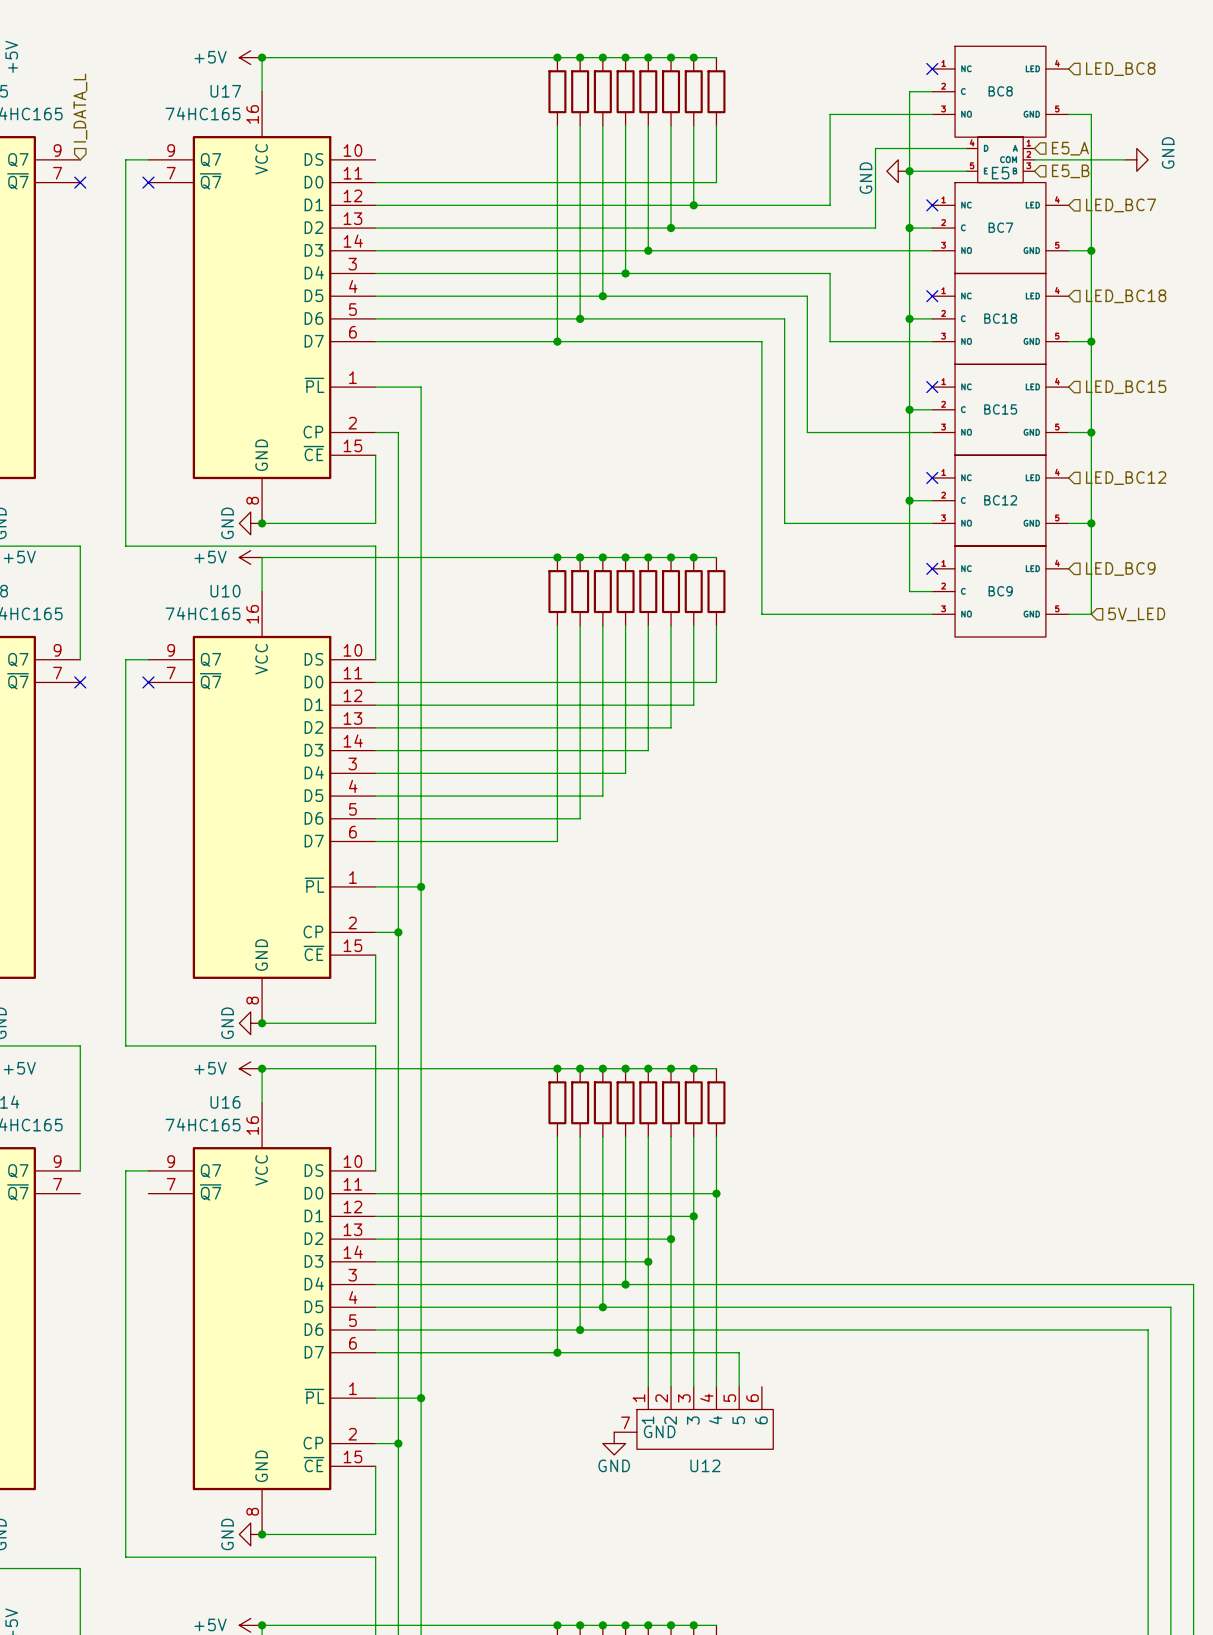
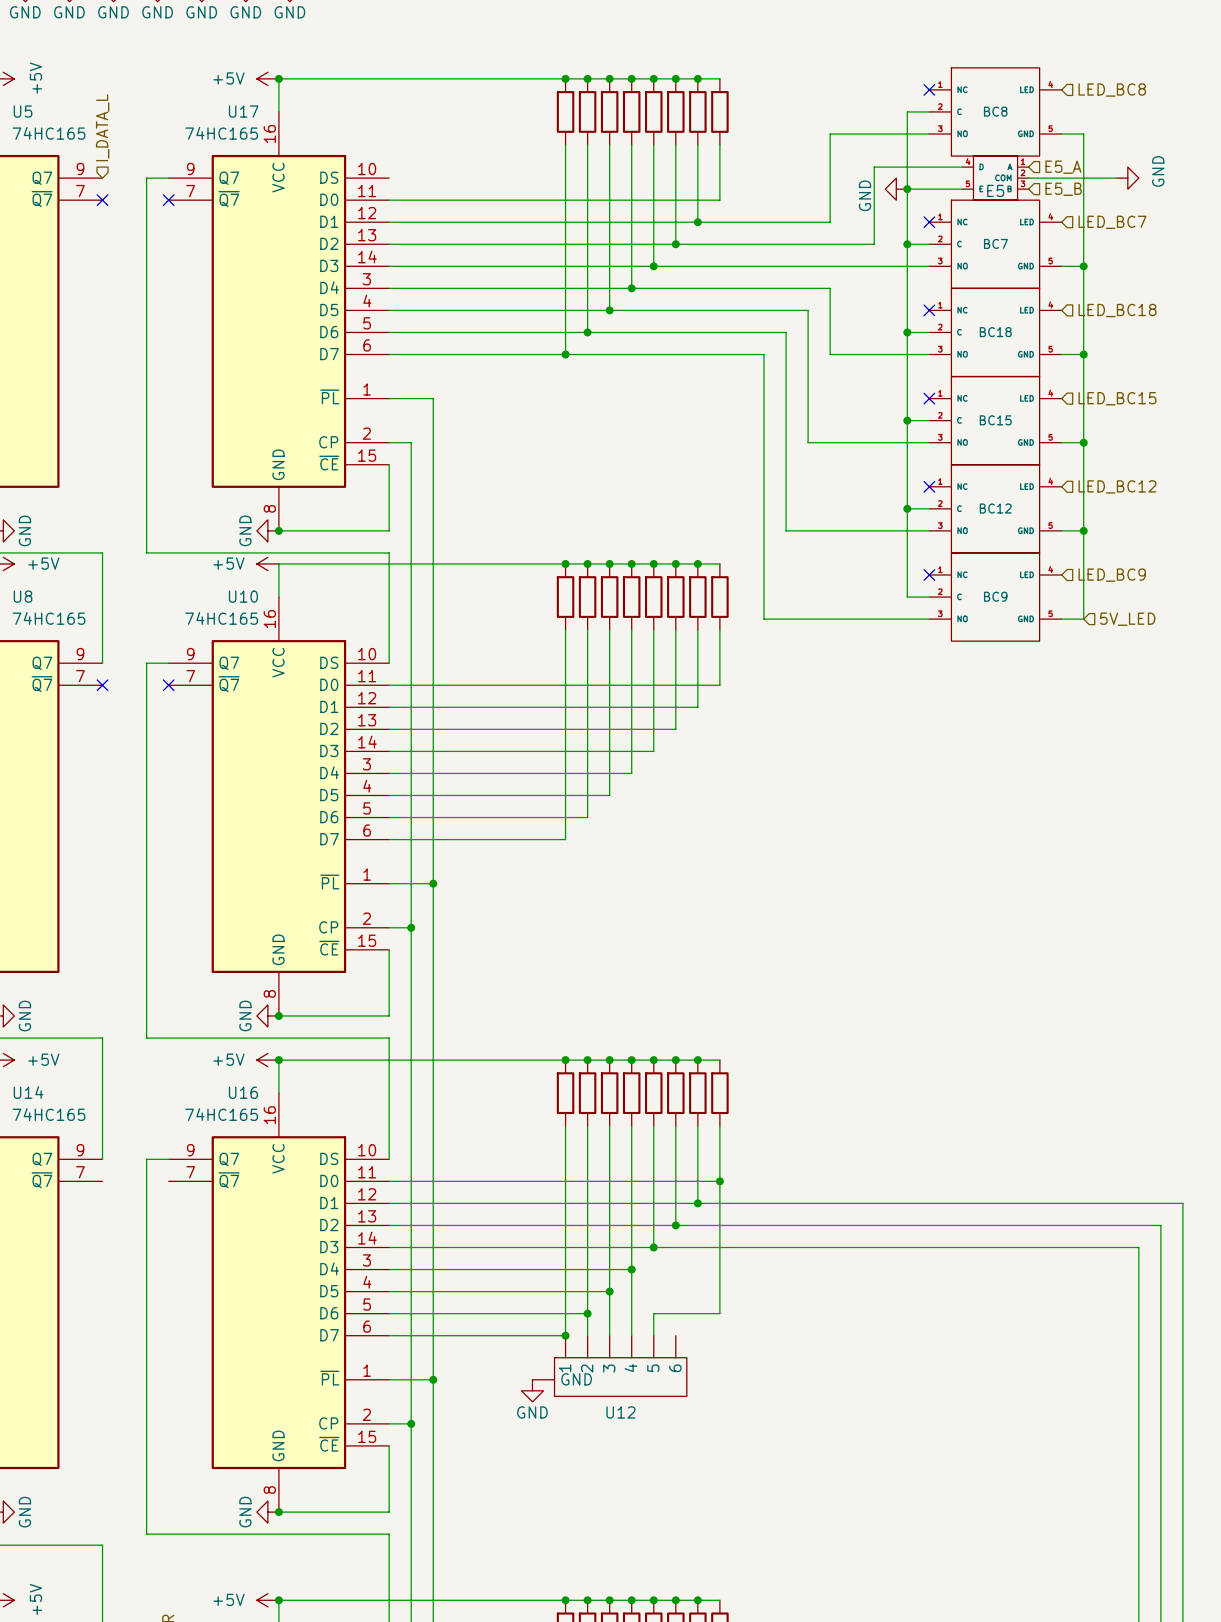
wire: (693, 1216) (693, 1386) -> none
wire: (671, 1239) (671, 1386) -> none
wire: (648, 1261) (648, 1329) (580, 1329) -> (587, 1335) (587, 1313)
wire: (625, 1284) (1193, 1284) -> (697, 1203) (1182, 1203) (1182, 1269)
wire: none -> (631, 1269) (631, 1335)
wire: (602, 1307) (1170, 1307) -> (675, 1225) (1160, 1225) (1160, 1291)
wire: none -> (609, 1291) (609, 1335)
wire: (1148, 1329) (716, 1329) (716, 1386) -> (1138, 1313) (1138, 1247) (653, 1247)
wire: (557, 1352) (739, 1352) (739, 1386) -> none
U12 pin number: 4 (706, 1397) -> none
U12 pin number: 1 (638, 1398) -> none
U12 pin number: 2 (661, 1398) -> none
U12 pin number: 3 (684, 1398) -> none
U12 pin number: 5 (729, 1398) -> none
U12 pin number: 6 (752, 1398) -> none
U12 position: (693, 1418) -> (609, 1366)
U12 pin number: 7 (625, 1422) -> none
power symbol position: GND (614, 1443) -> GND (532, 1390)

